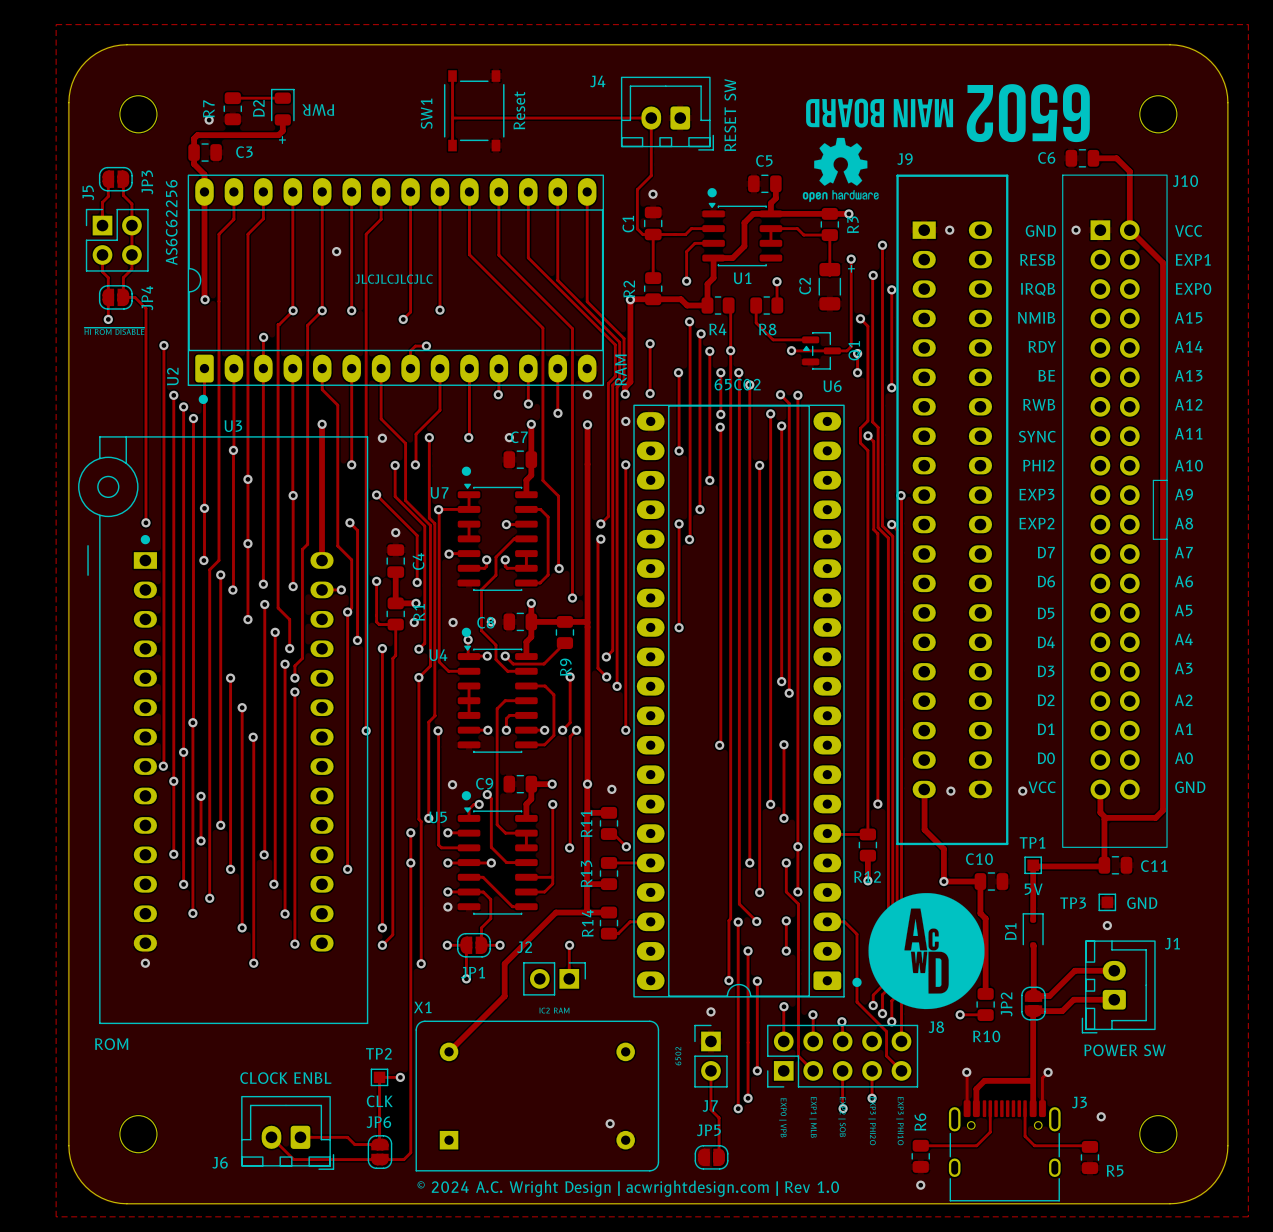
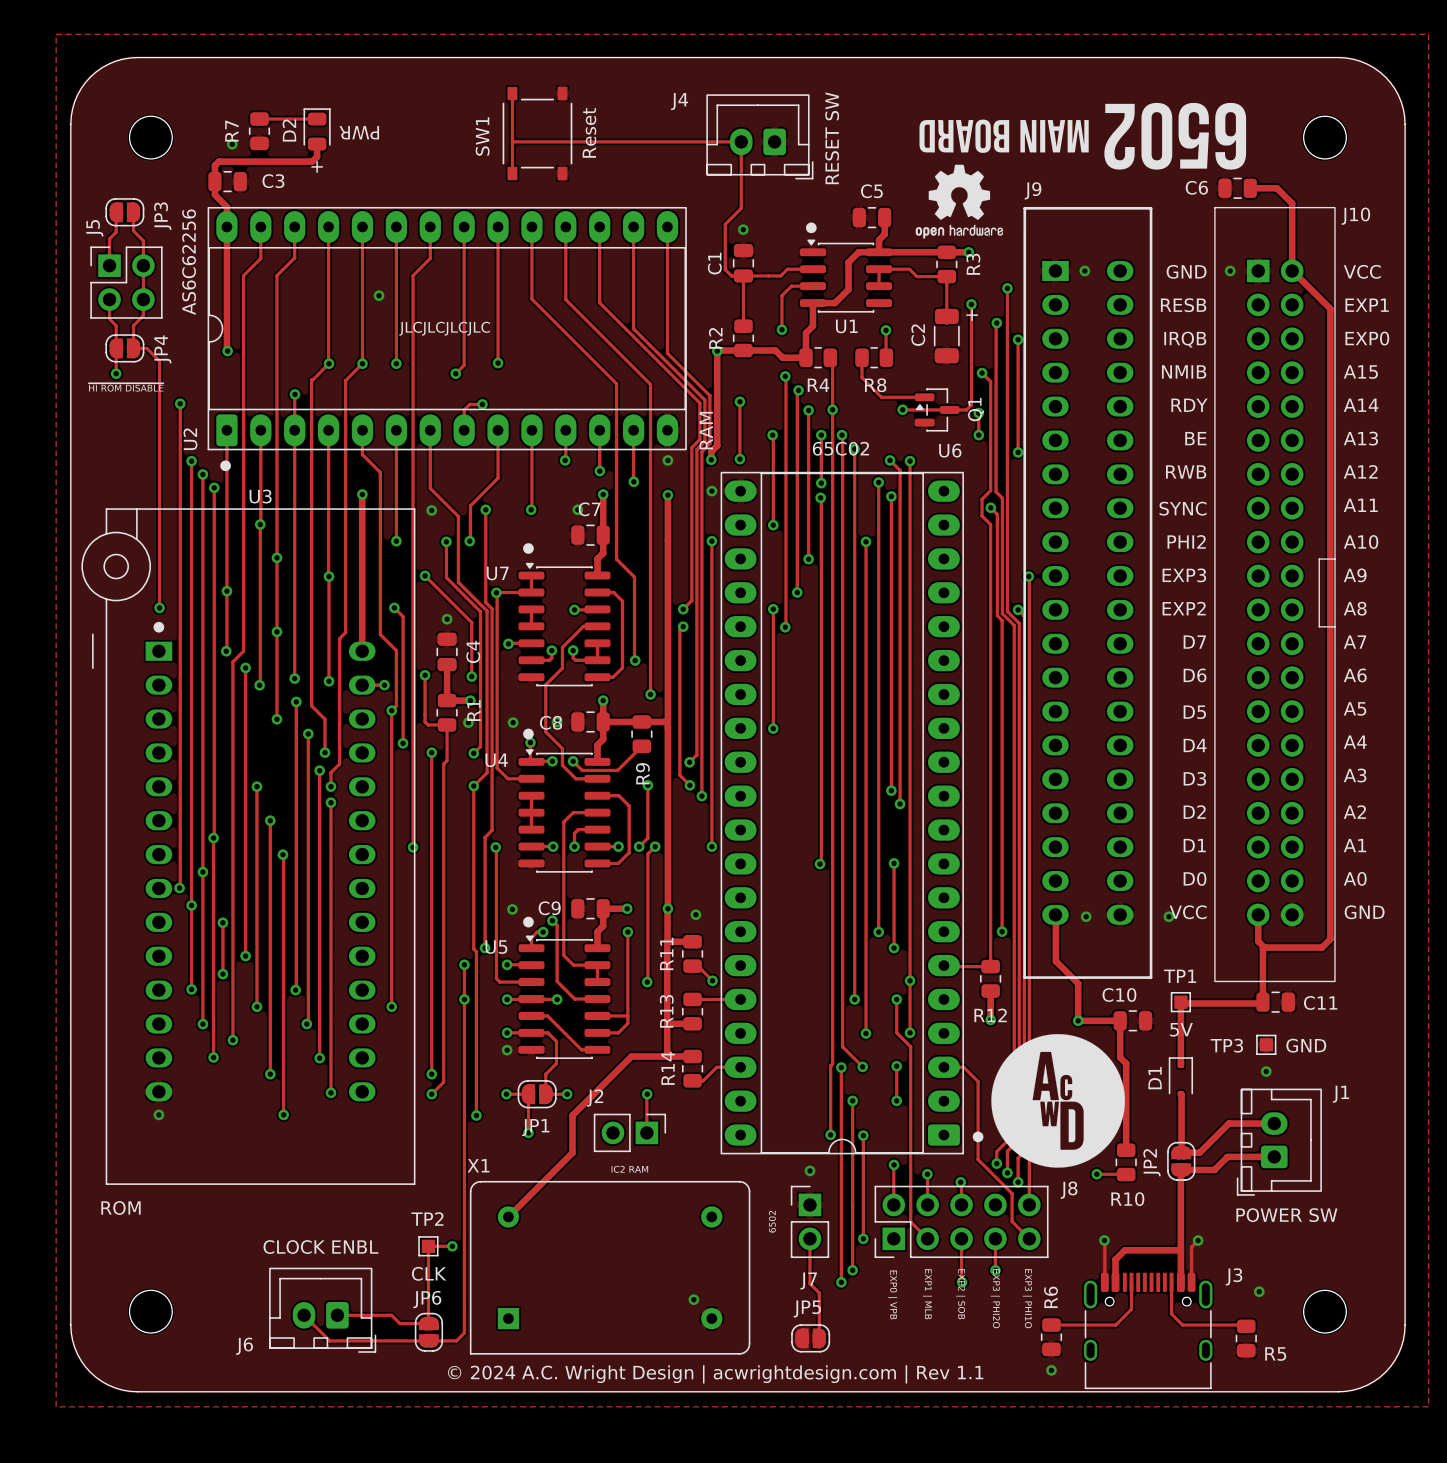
text: © 2024 A.C. Wright Design | acwrightdesign.com | Rev 1.0 (628, 1188) -> © 2024 A.C. Wright Design | acwrightdesign.com | Rev 1.1 (715, 1374)

